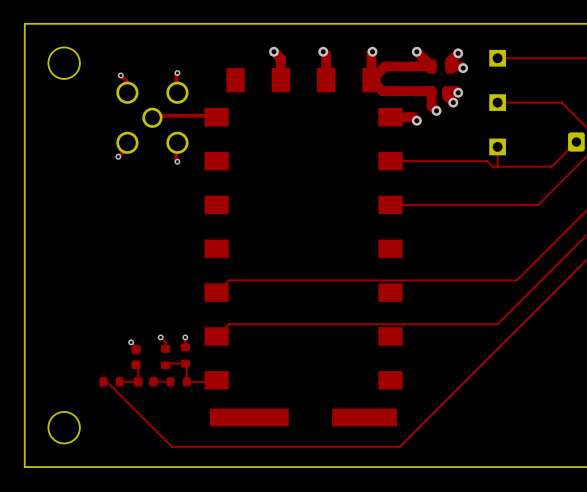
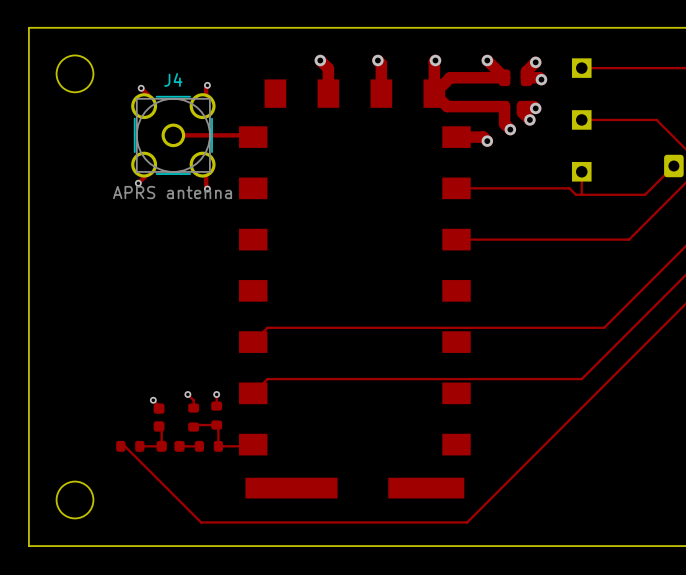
J4 side: top (152, 117) -> bottom (173, 135)

